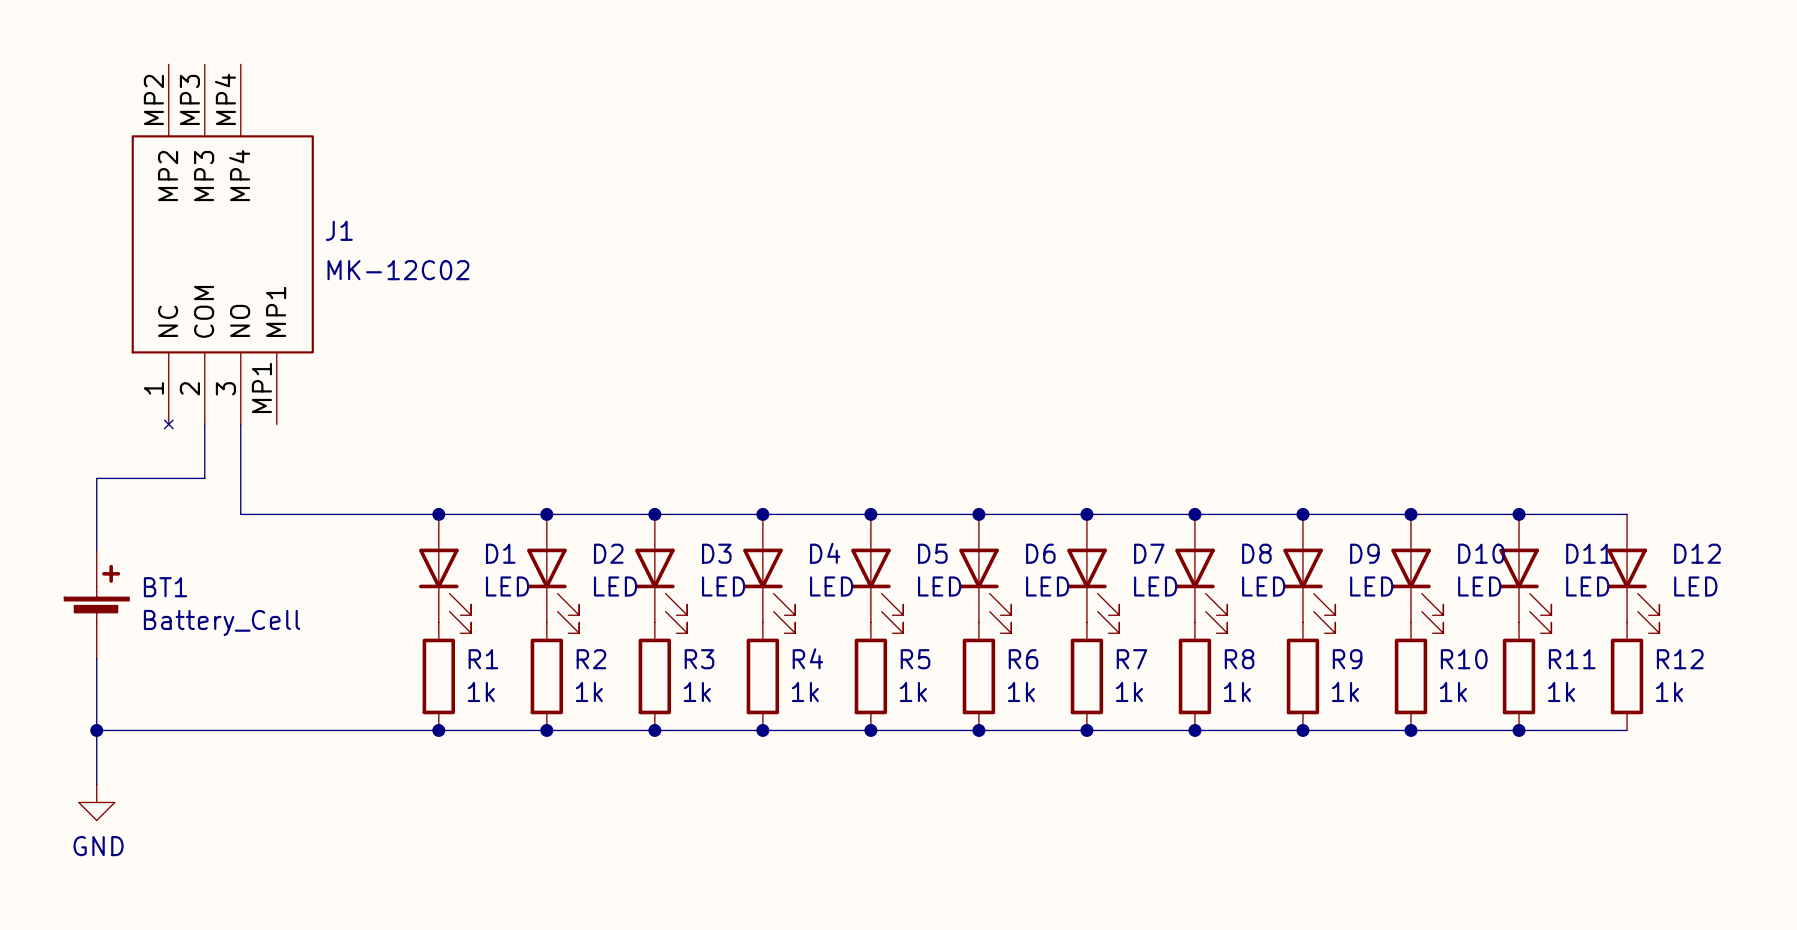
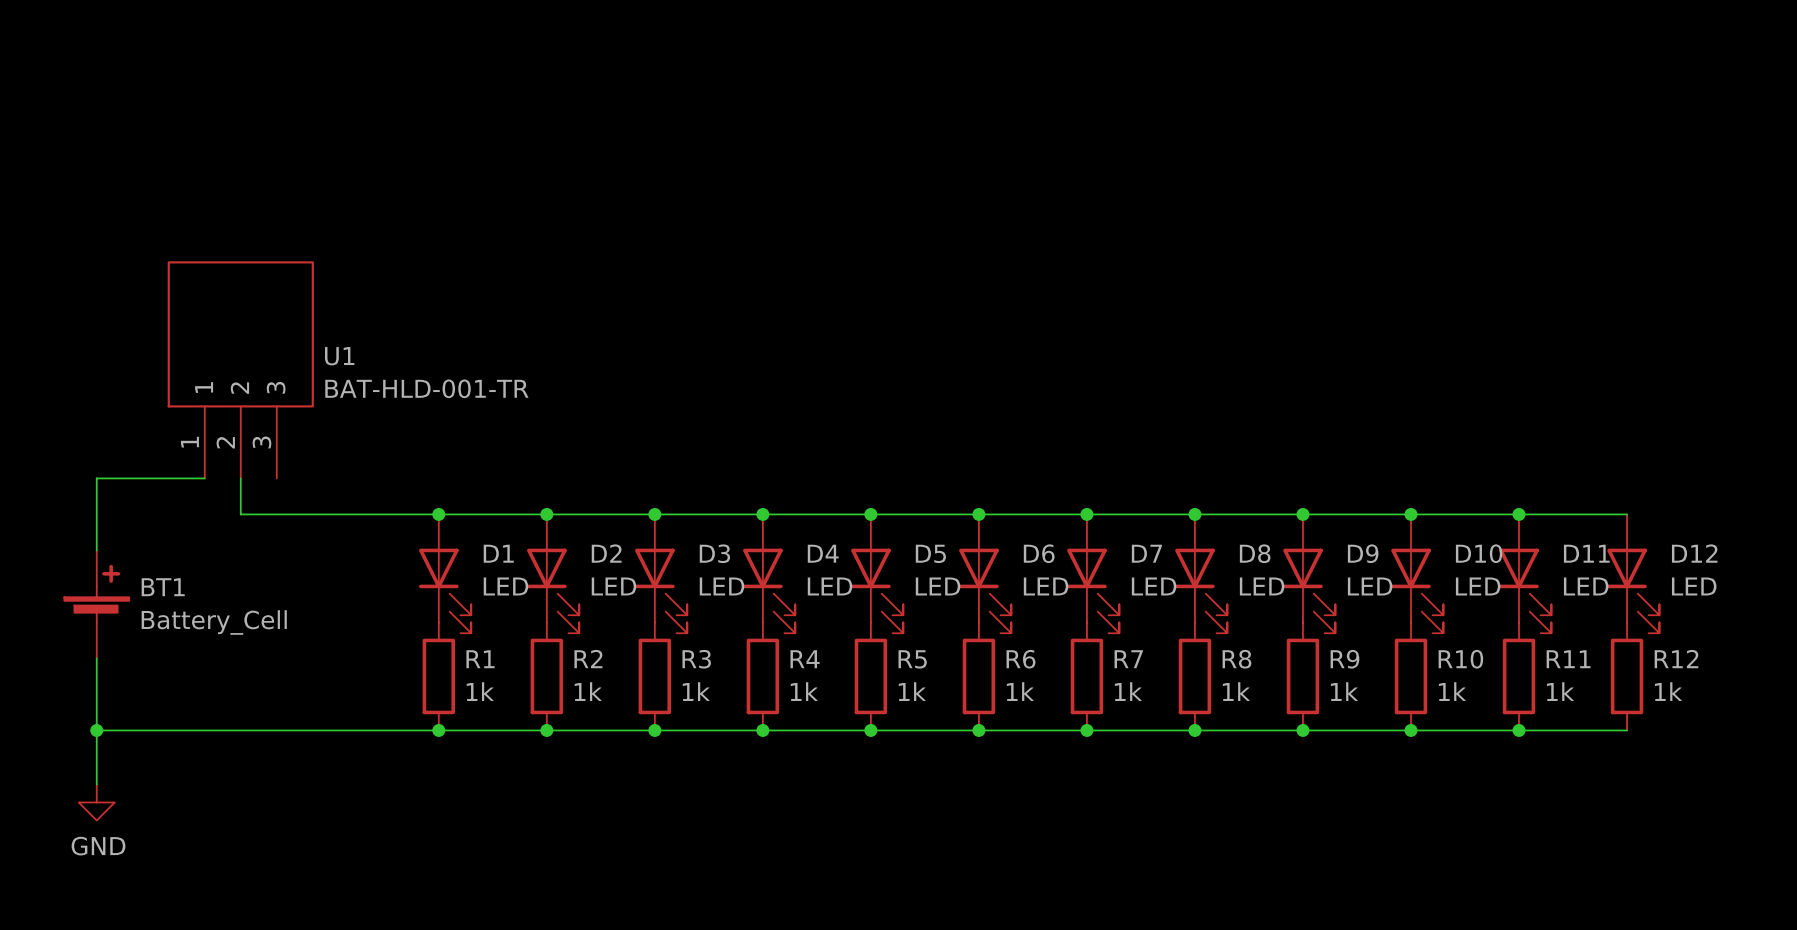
J1: MK-12C02 (222, 246) -> none
U1: none -> BAT-HLD-001-TR (240, 369)

